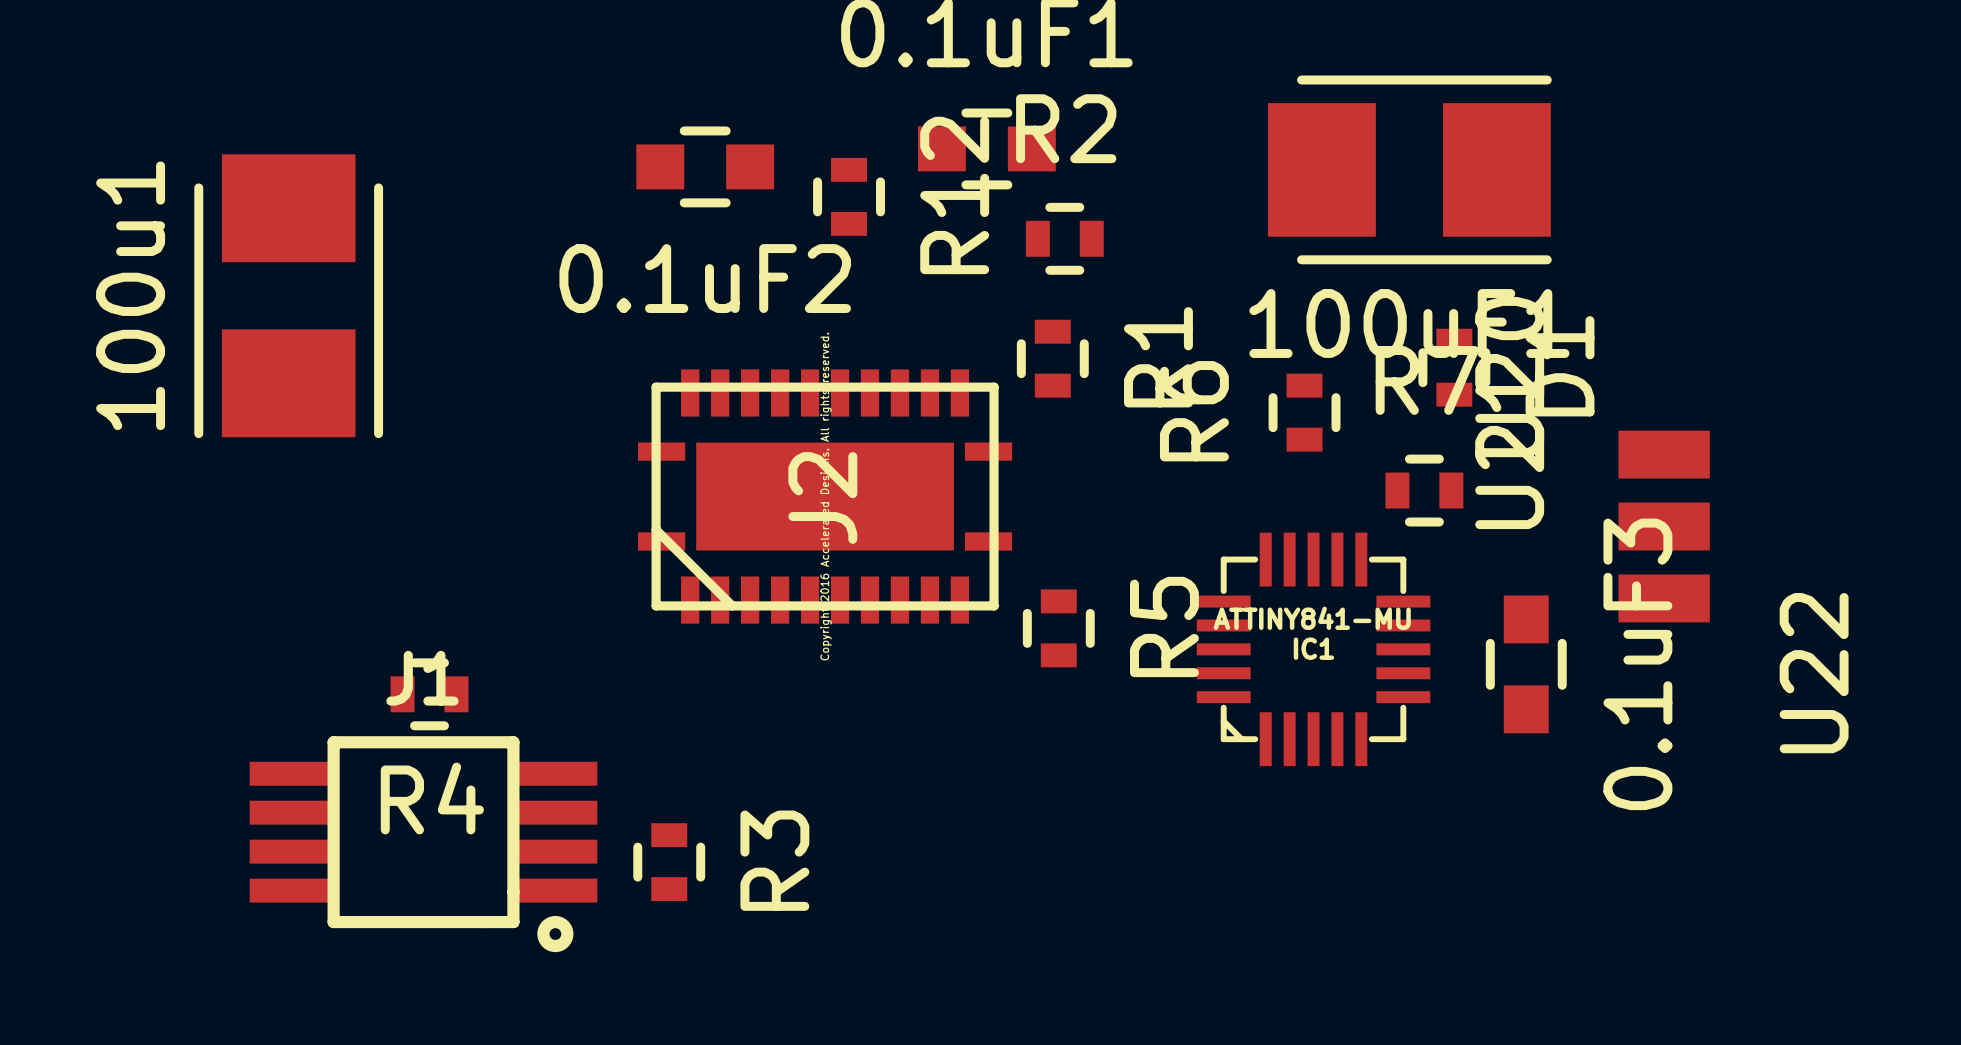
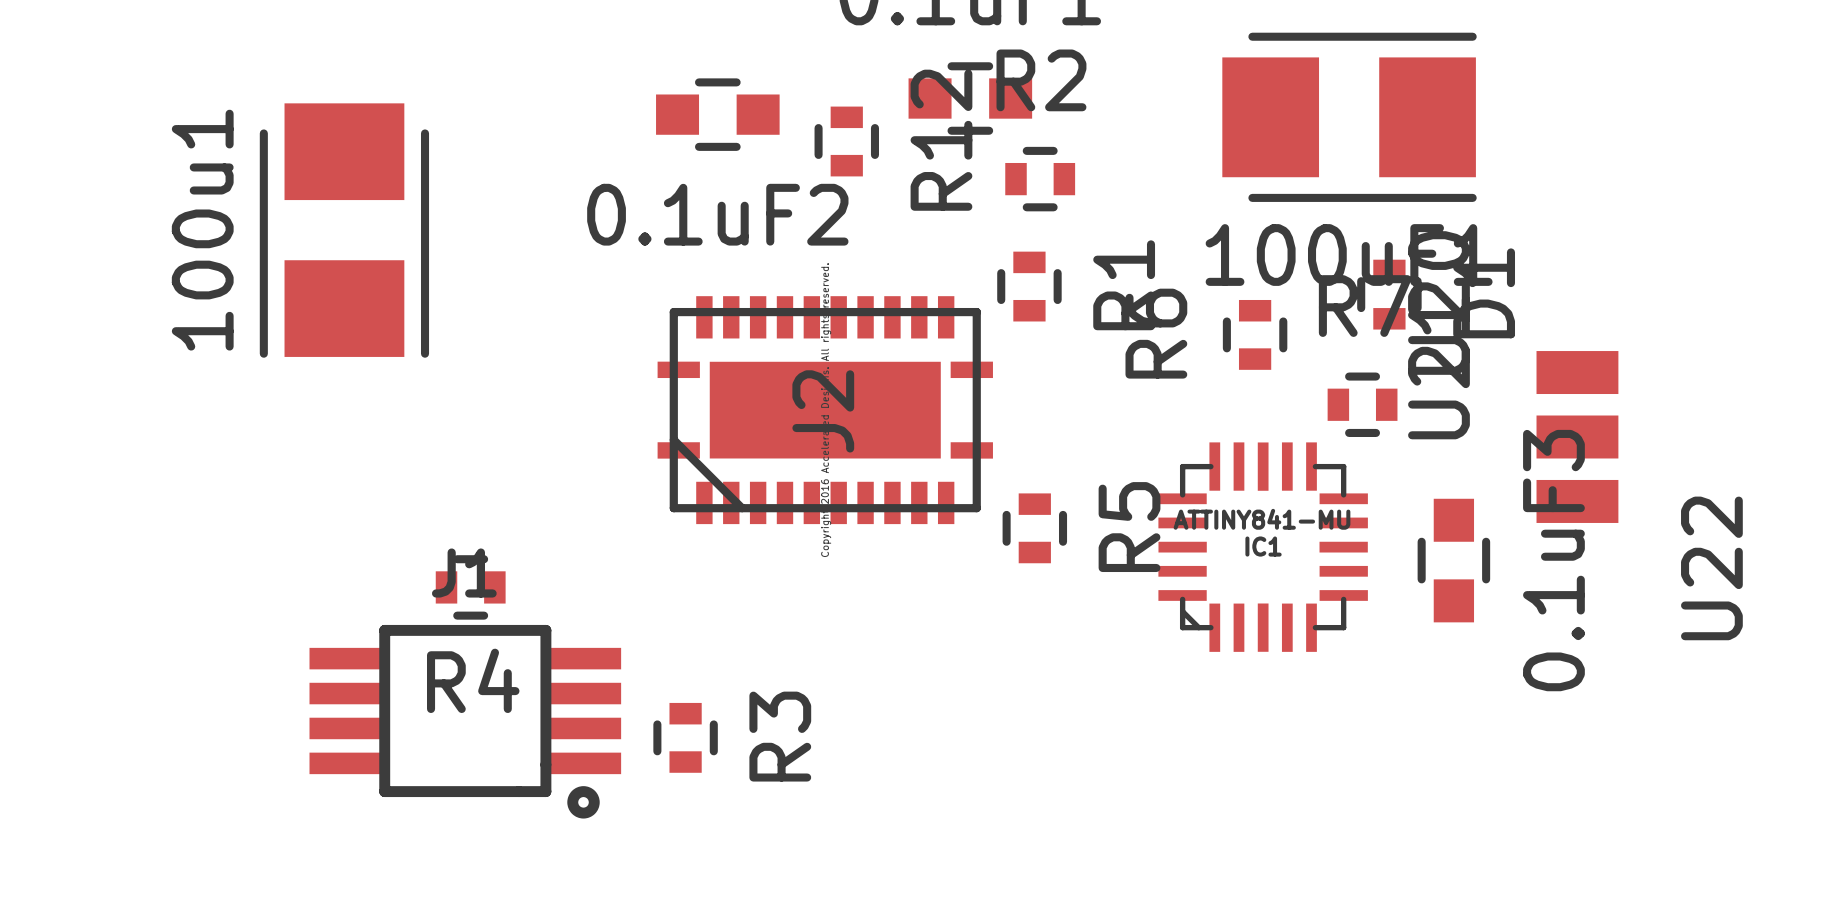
IC1 footprint: [1196, 532, 1431, 767] -> [1158, 442, 1368, 652]

